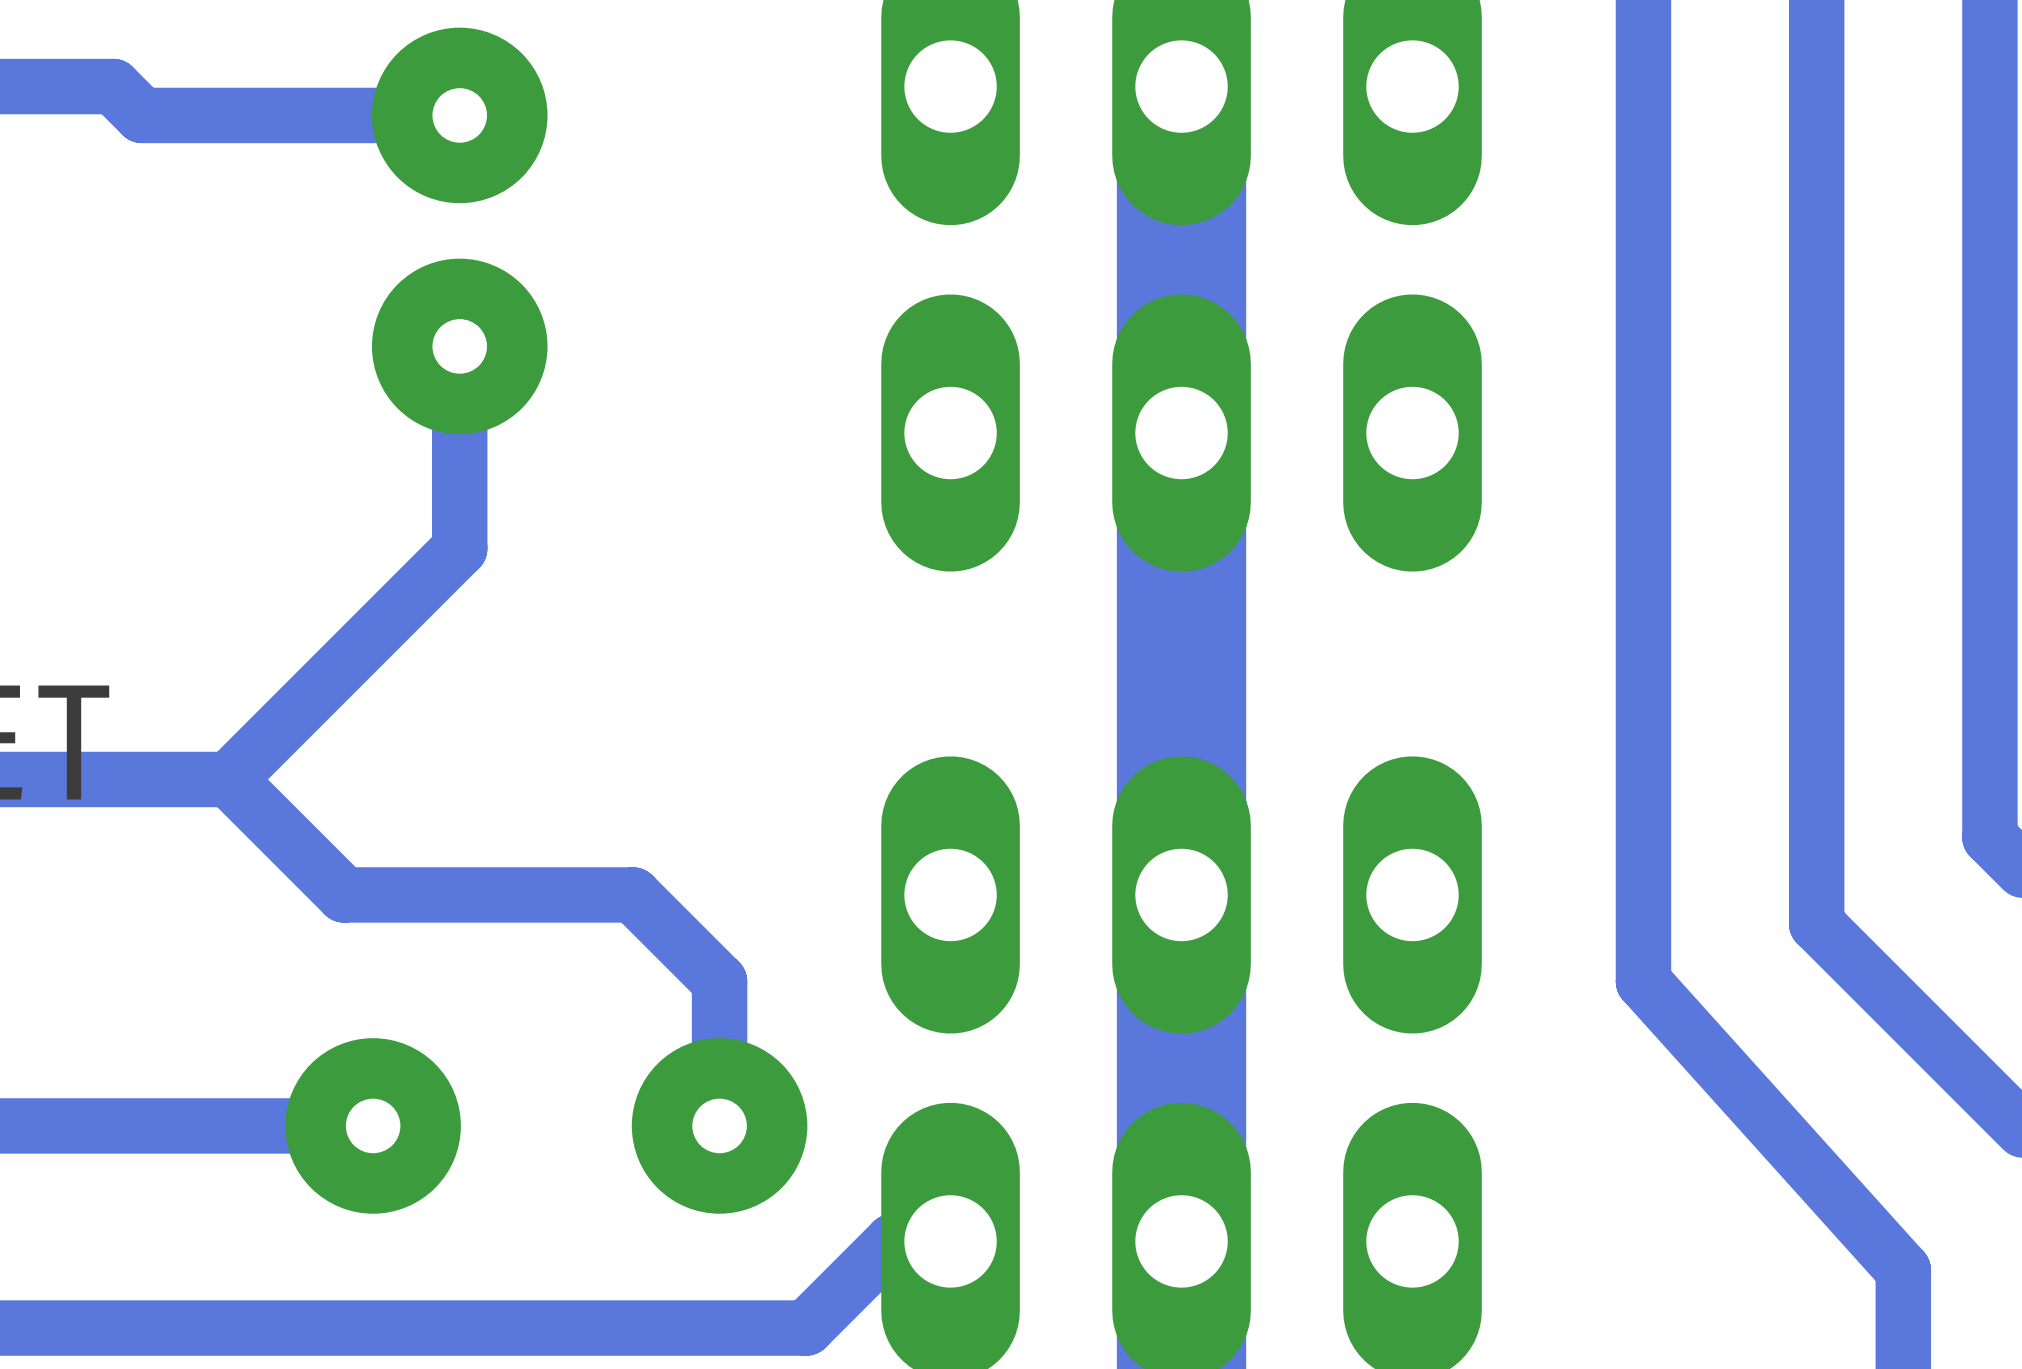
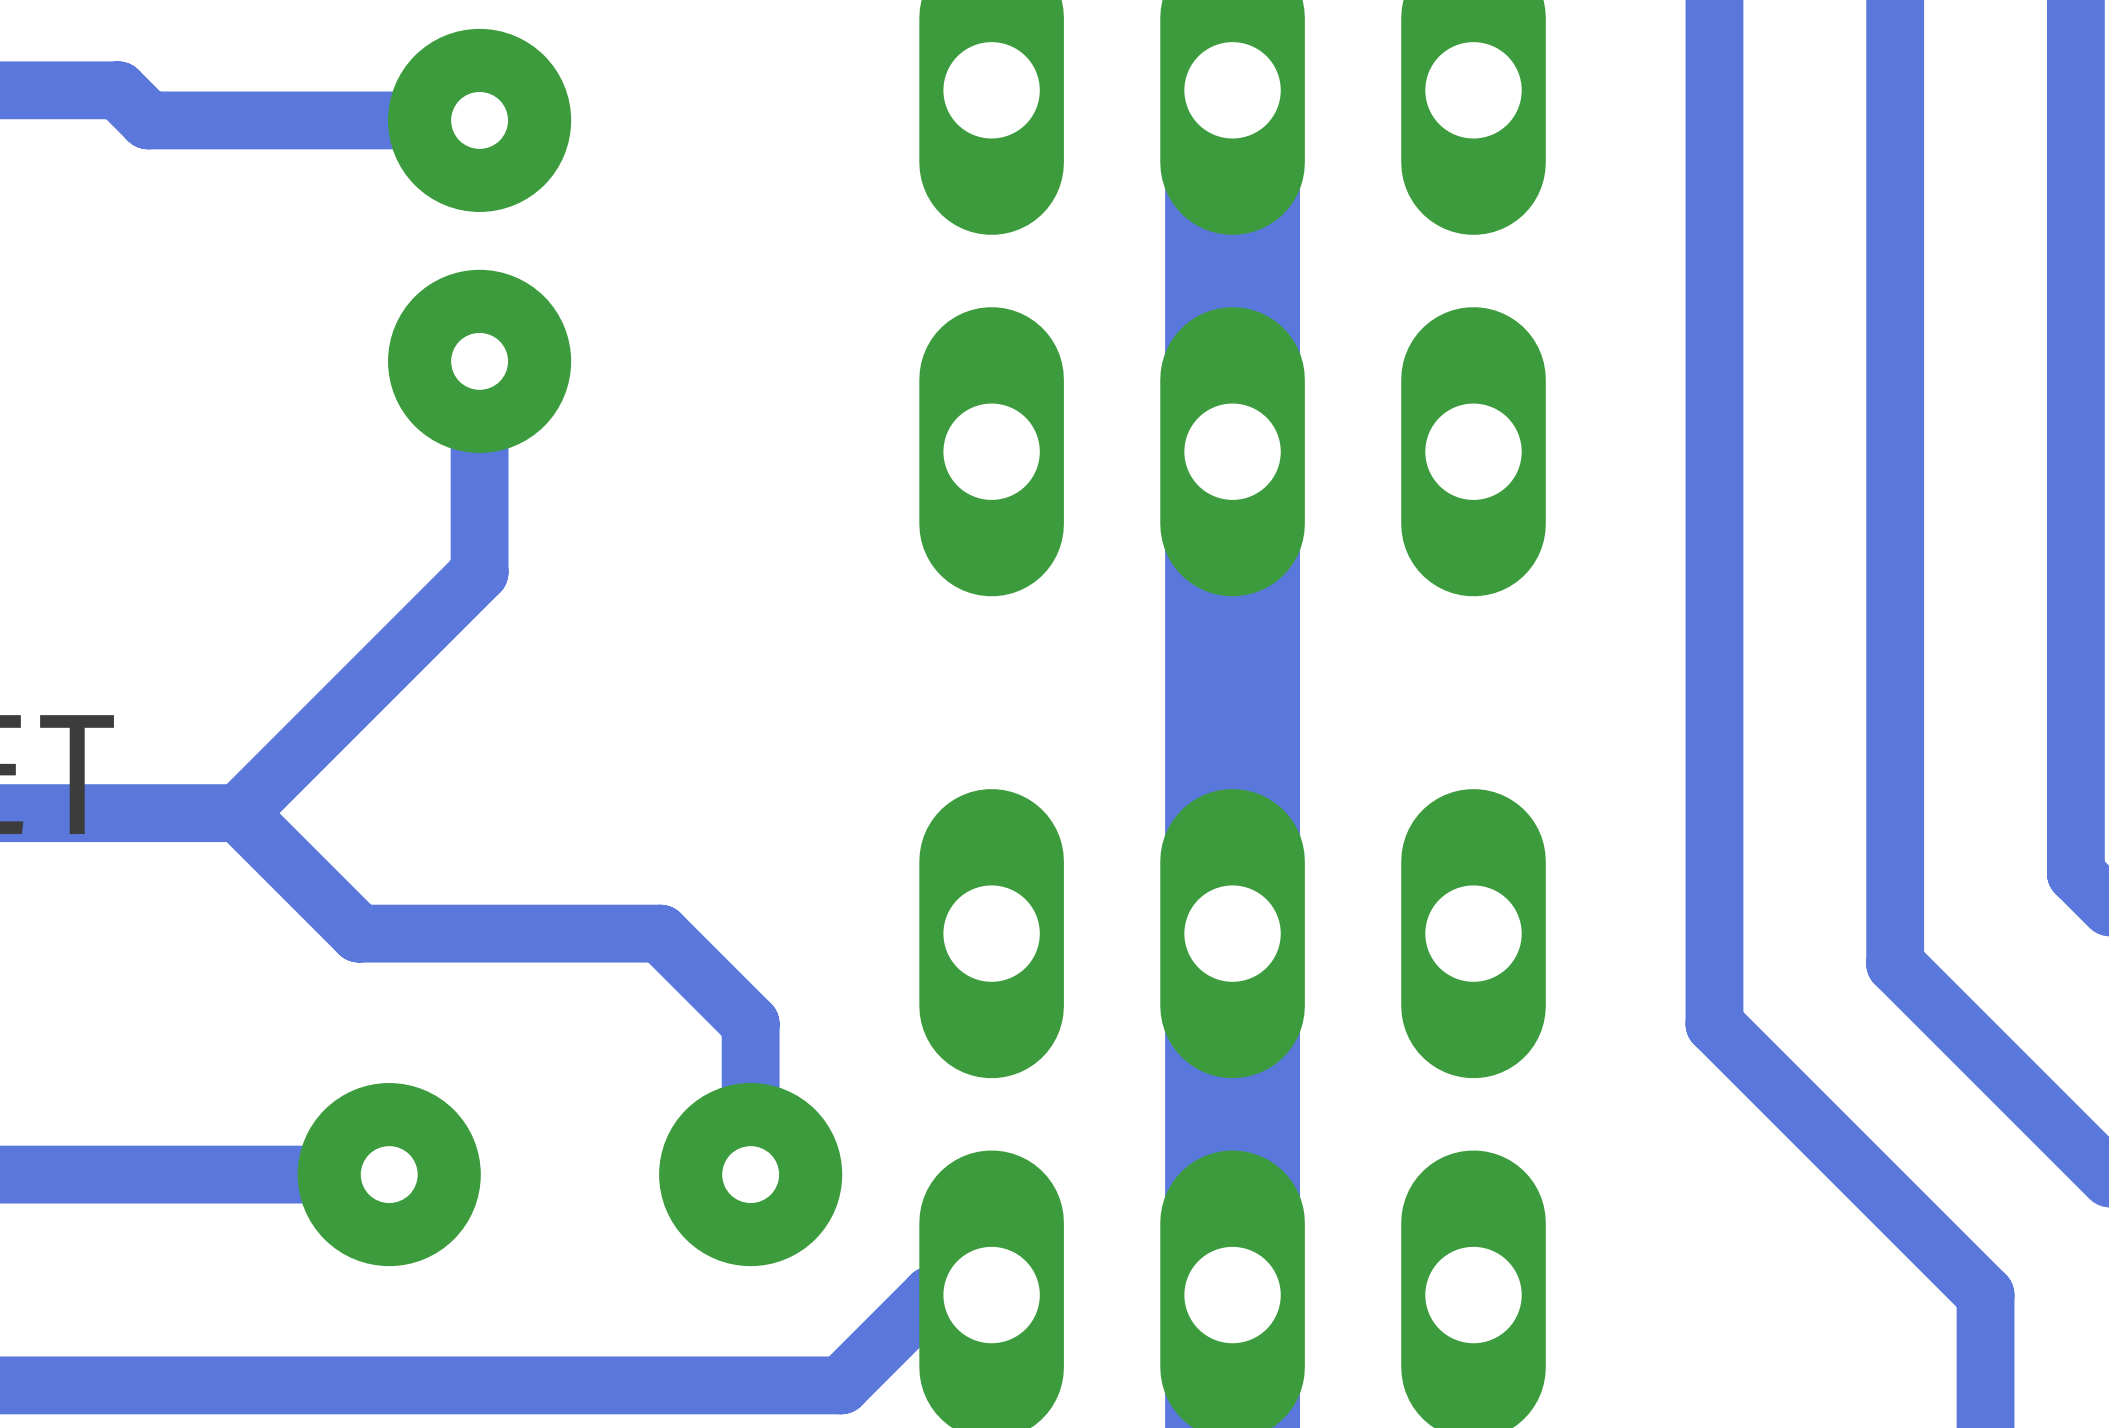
track: (1643, 981) (1903, 1270) -> (1714, 1023) (1985, 1295) (1985, 1325)

